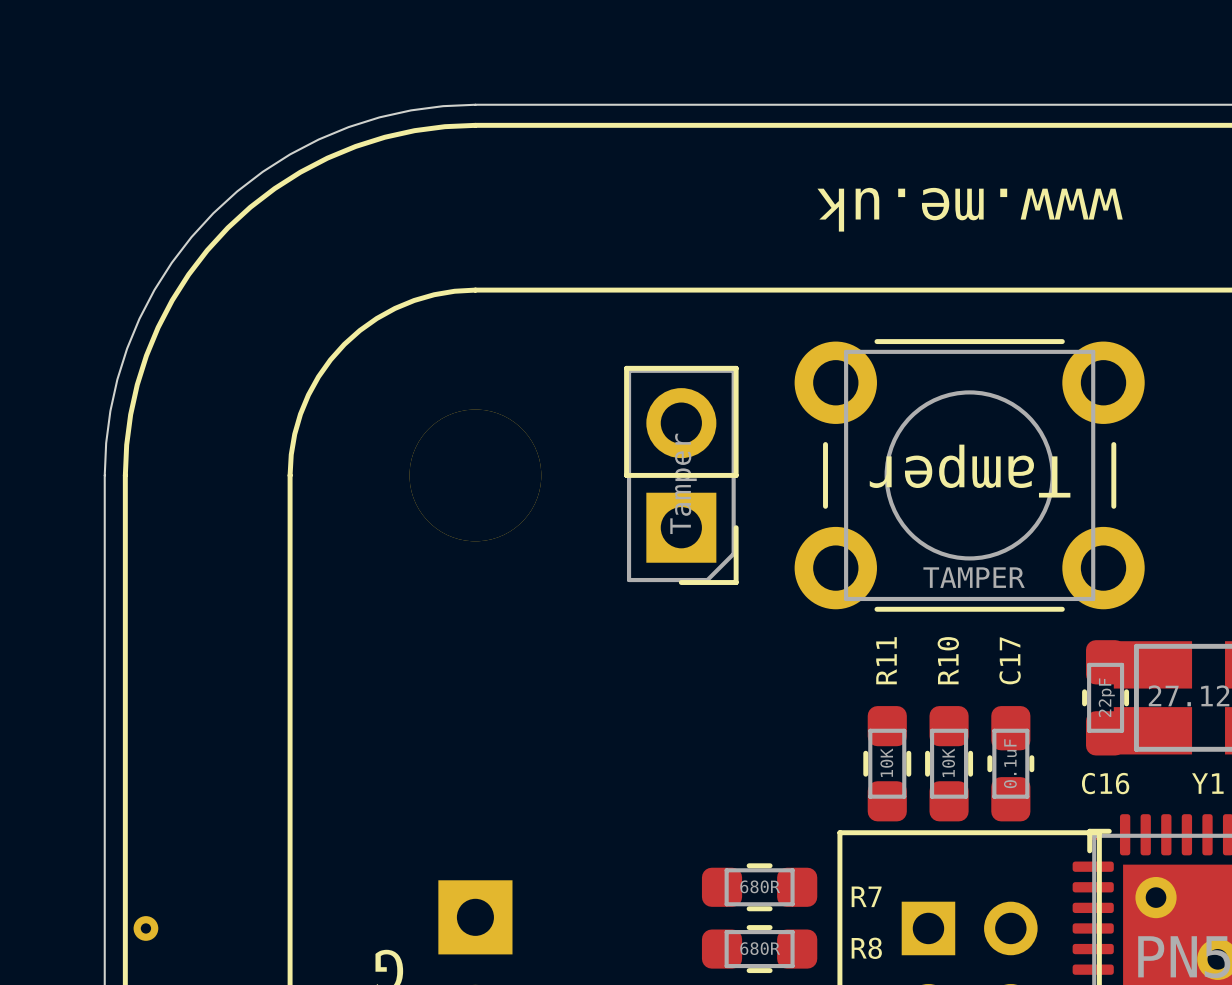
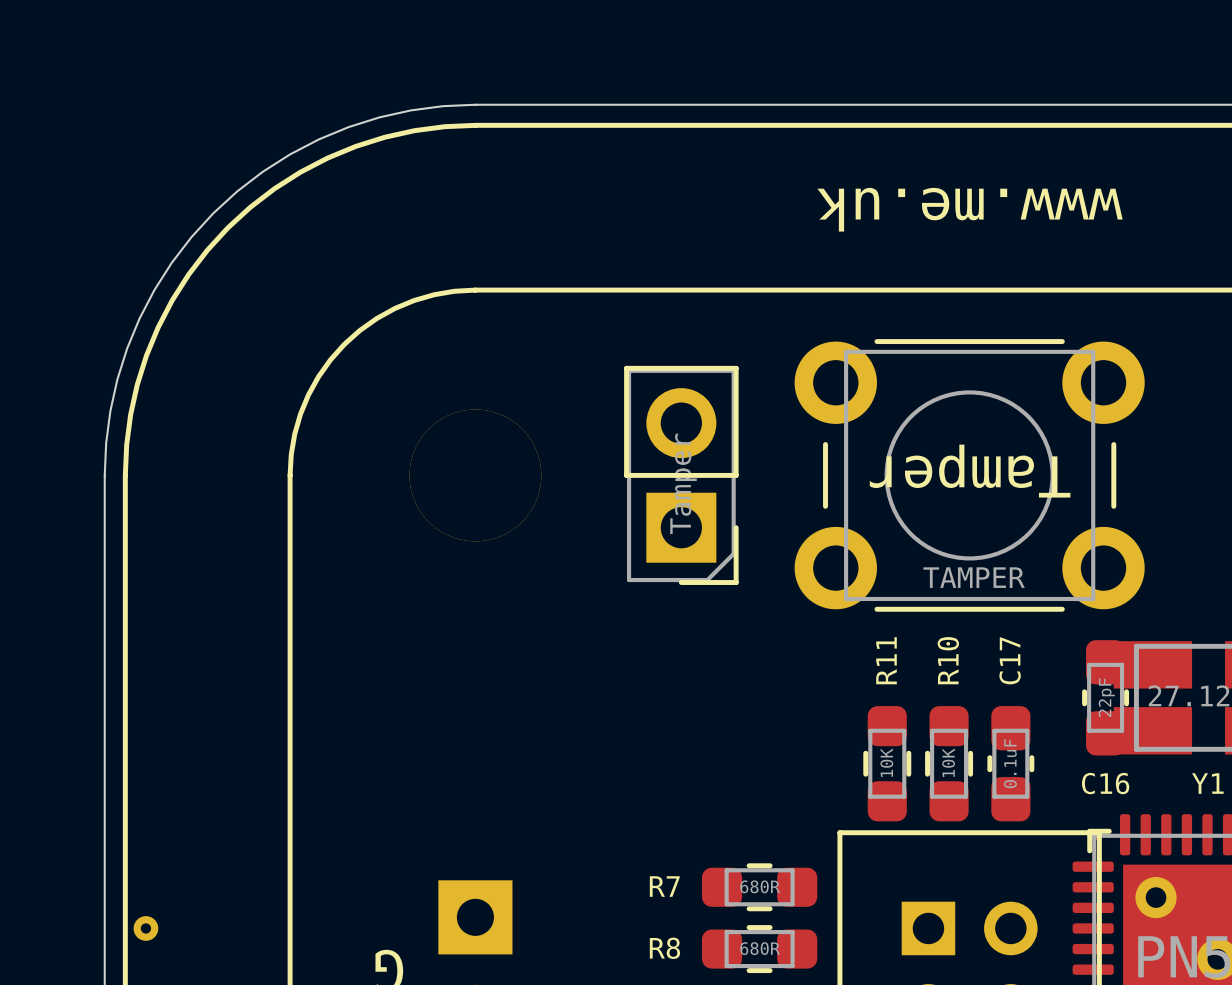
R7 name position: R7 (866, 896) -> R7 (664, 886)
R8 name position: R8 (866, 948) -> R8 (664, 948)

